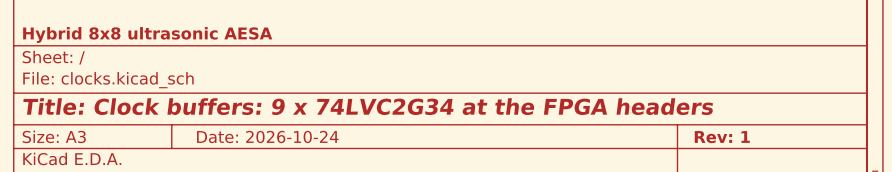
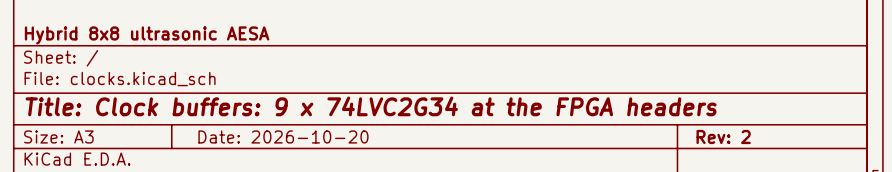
title block: Date: 2026-10-24 (267, 136) -> Date: 2026-10-20 (283, 136)
title block: Rev: 1 (722, 137) -> Rev: 2 (723, 136)

